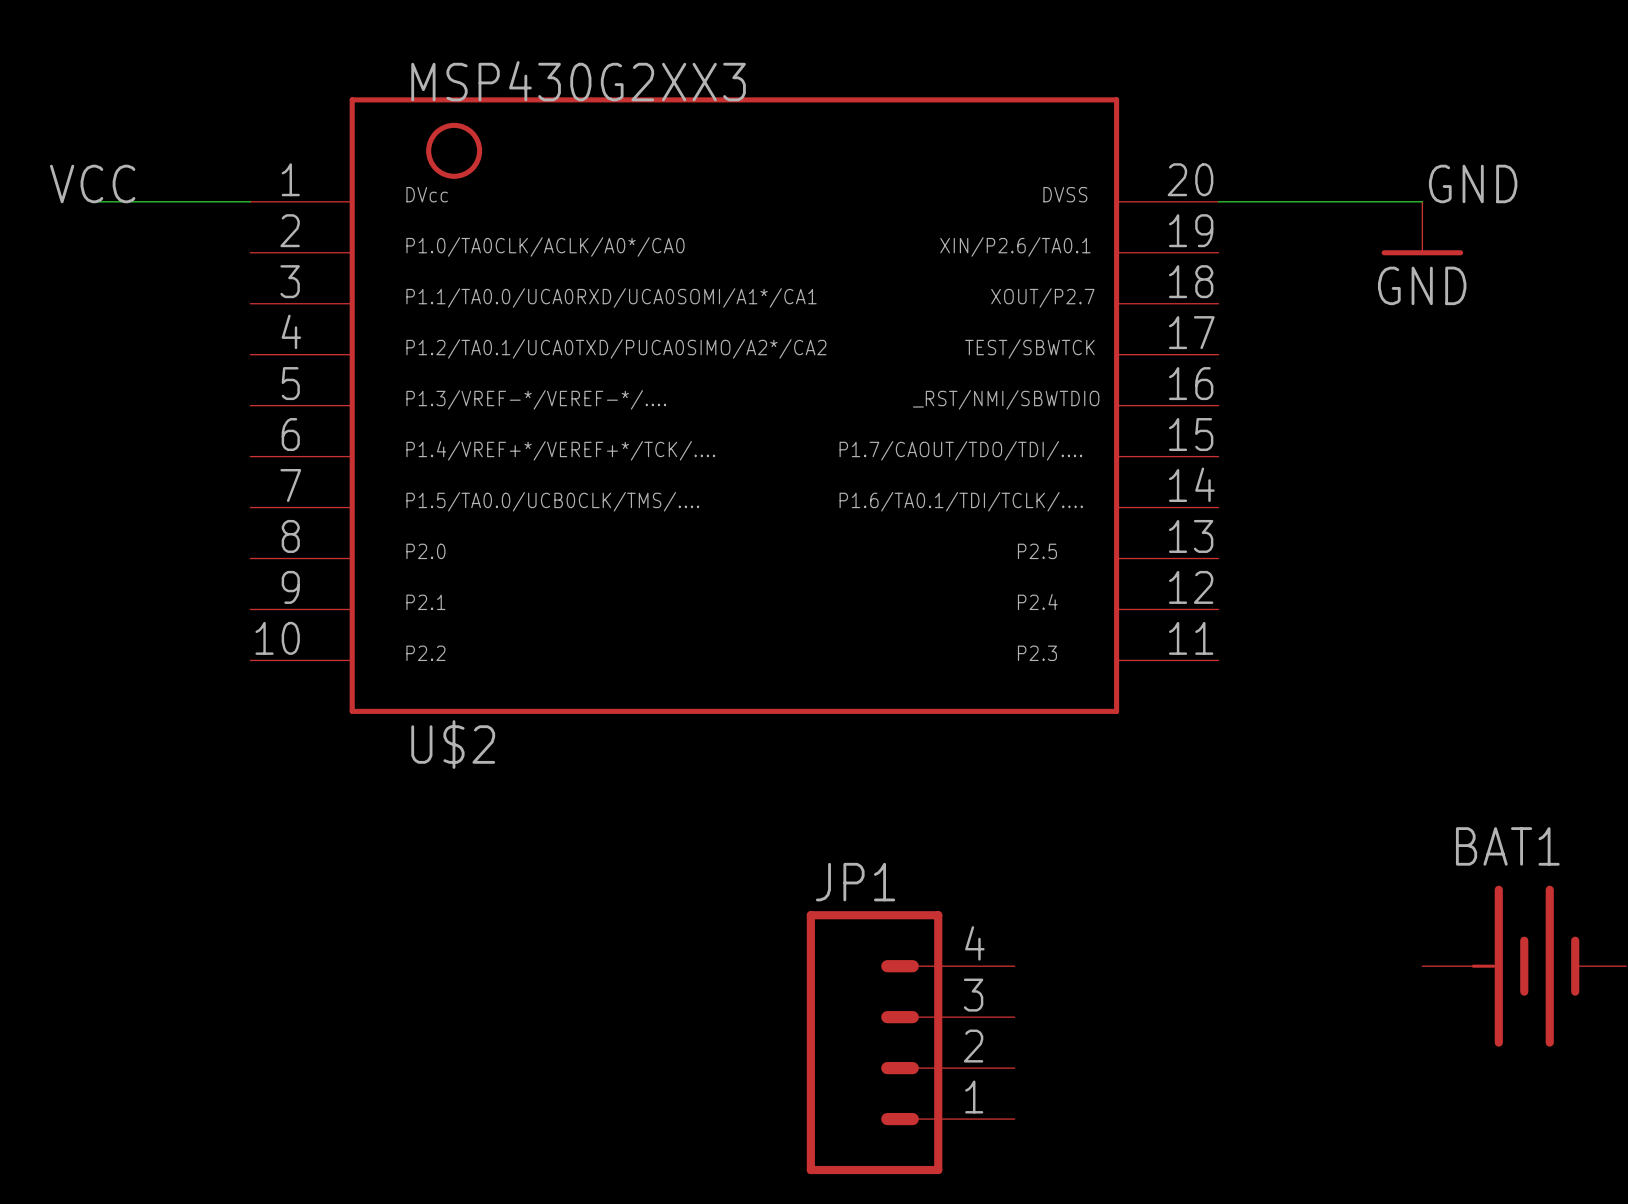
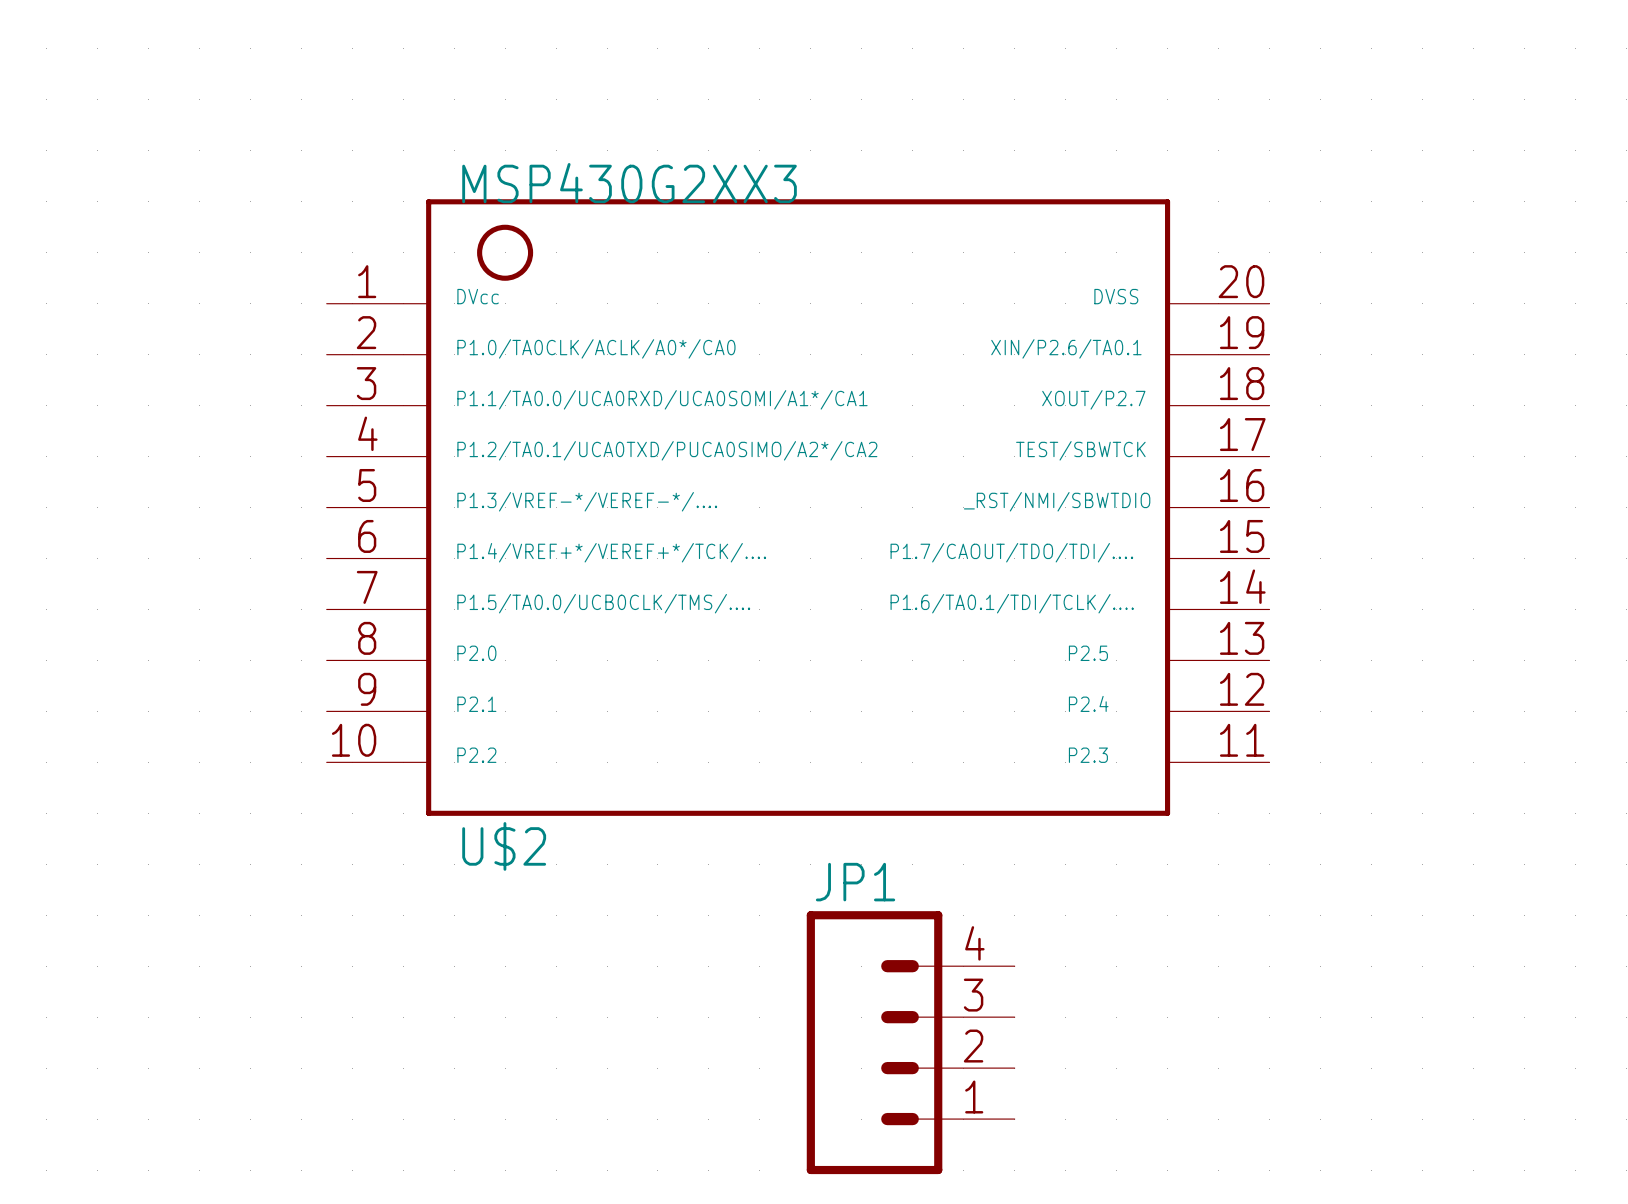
U$2 symbol: [250, 97, 1219, 714] -> [326, 199, 1270, 816]
label: VCC (92, 183) -> none
label: GND (1473, 183) -> none
wire: (97, 201) (250, 201) -> none
wire: (1218, 201) (1422, 201) -> none
power symbol: GND (1422, 228) -> none
BAT1: (1524, 966) -> none

